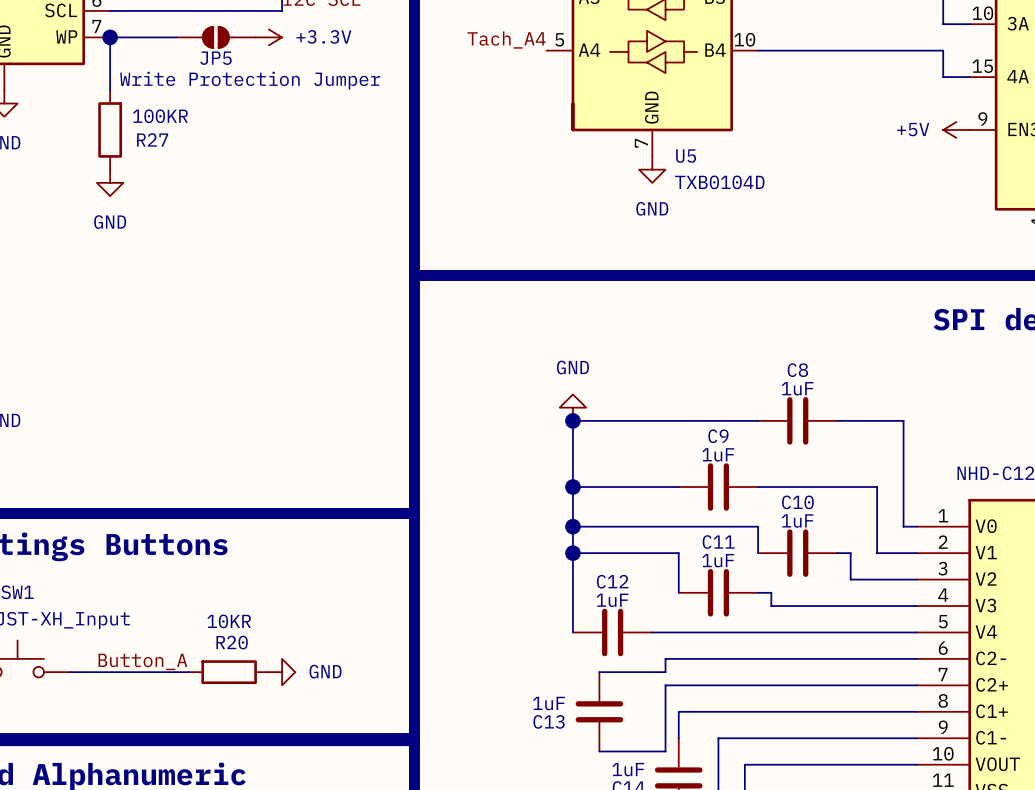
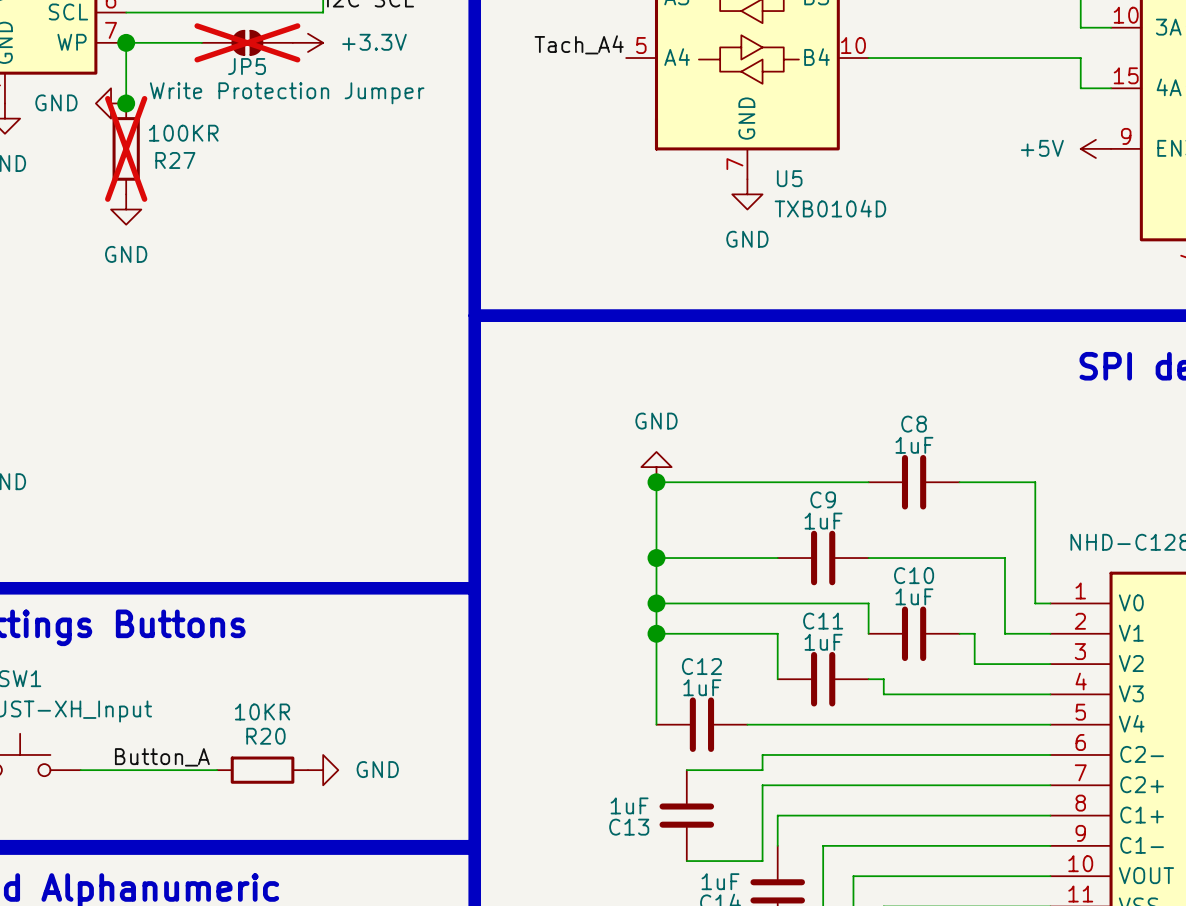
JP5 do-not-place cross: none -> (247, 42)
power symbol: none -> GND (111, 103)
junction: none -> (126, 103)
R27 do-not-place cross: none -> (126, 148)

